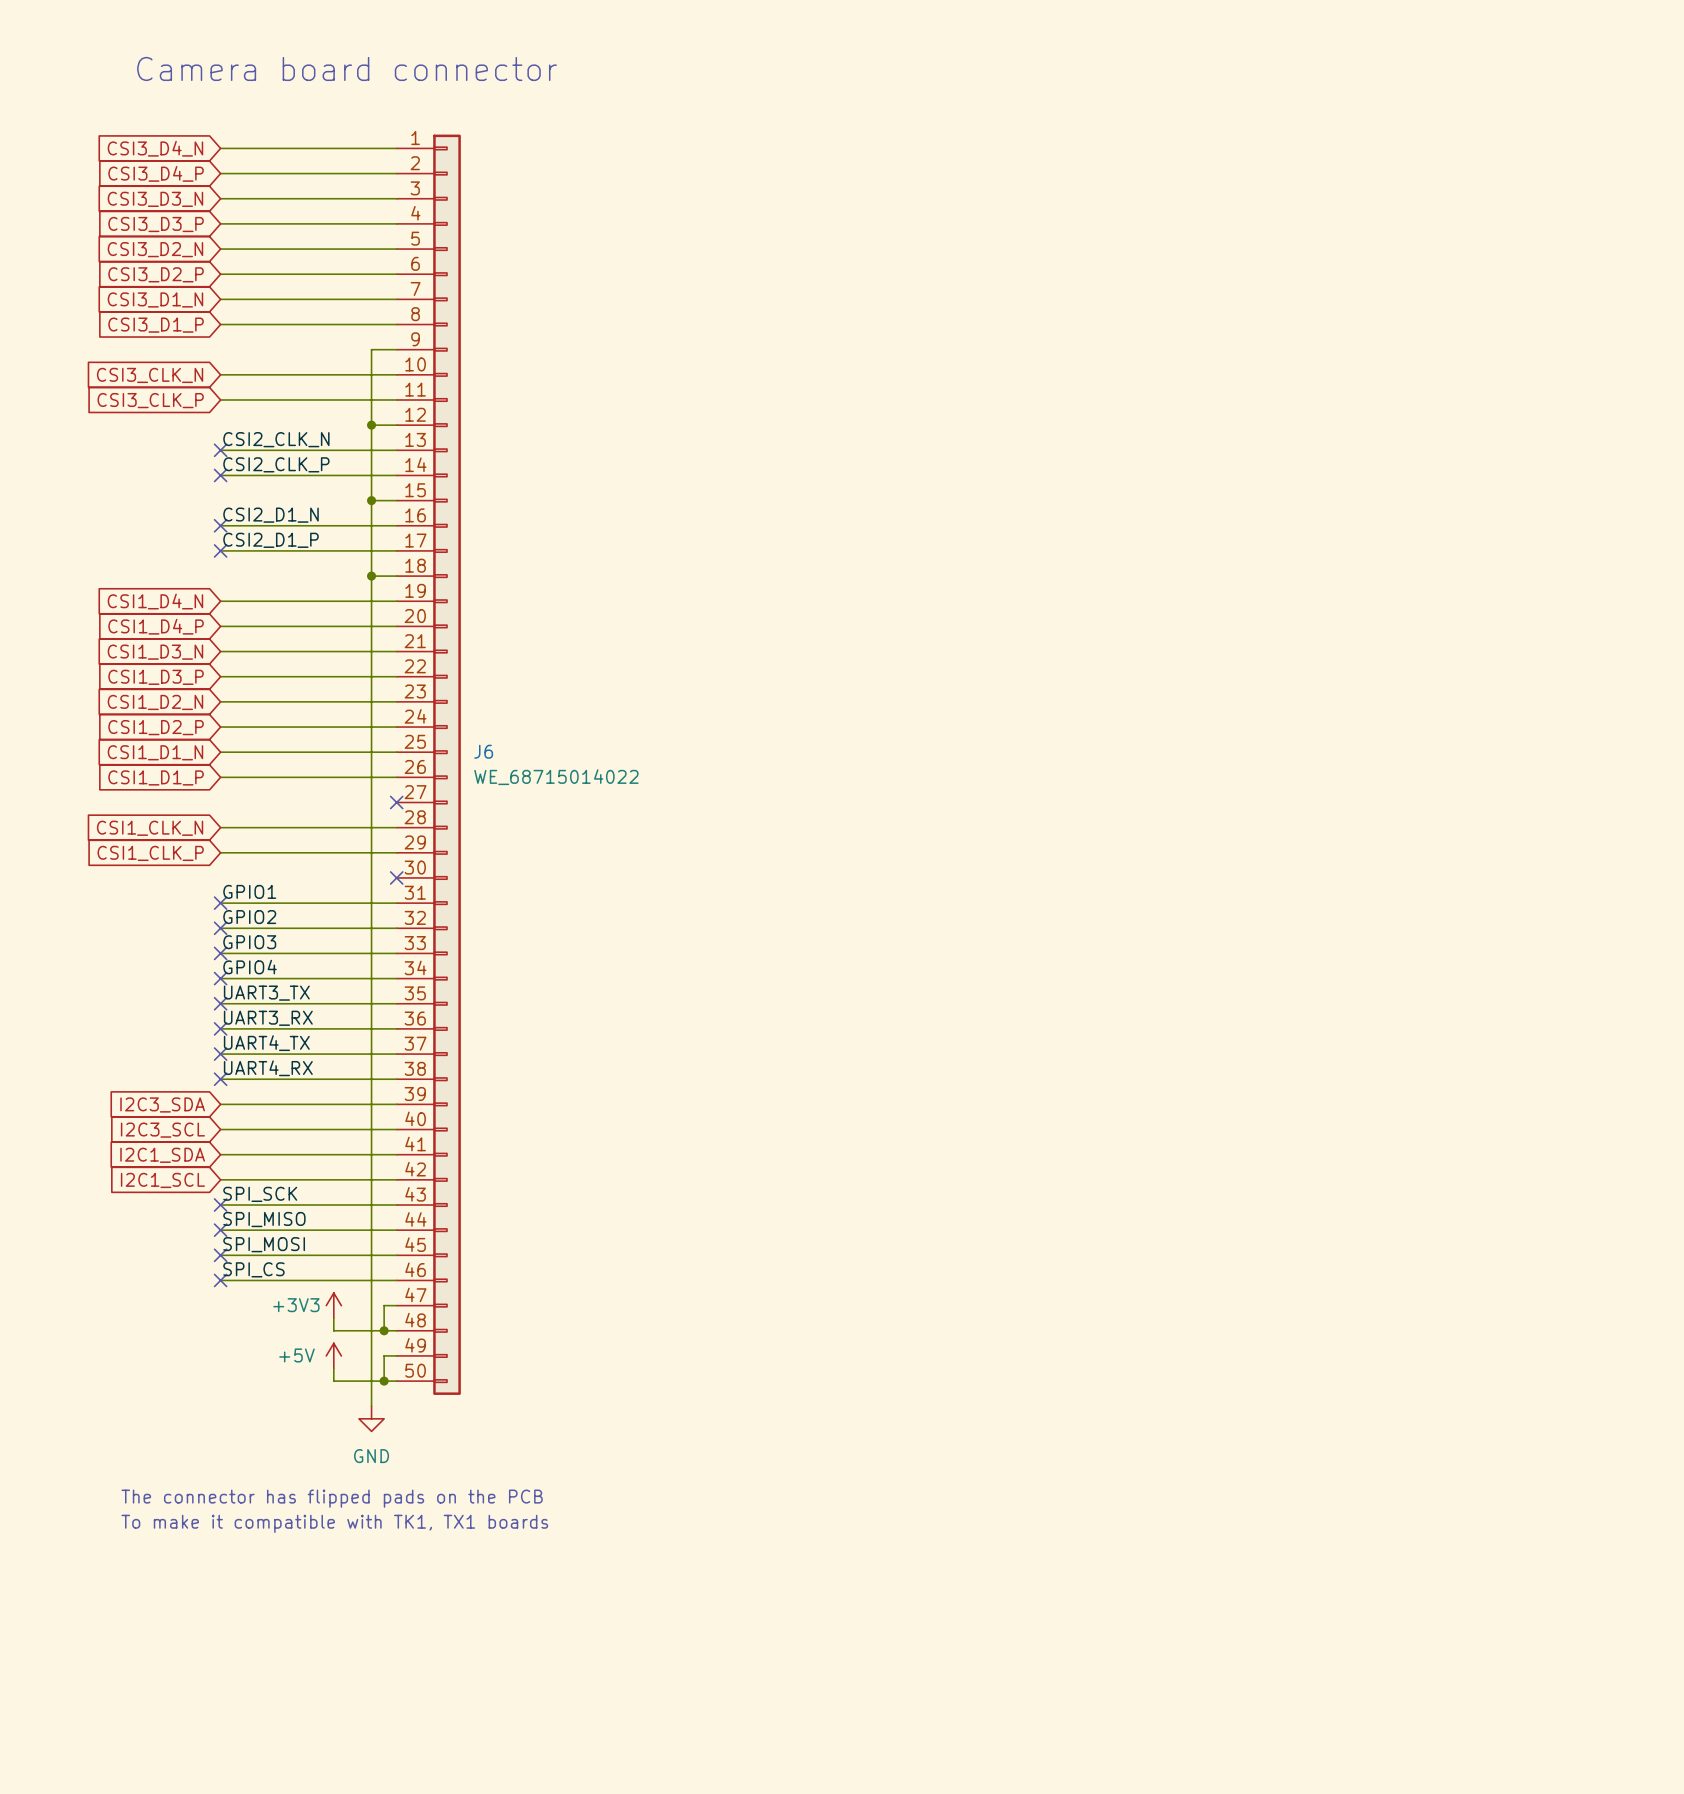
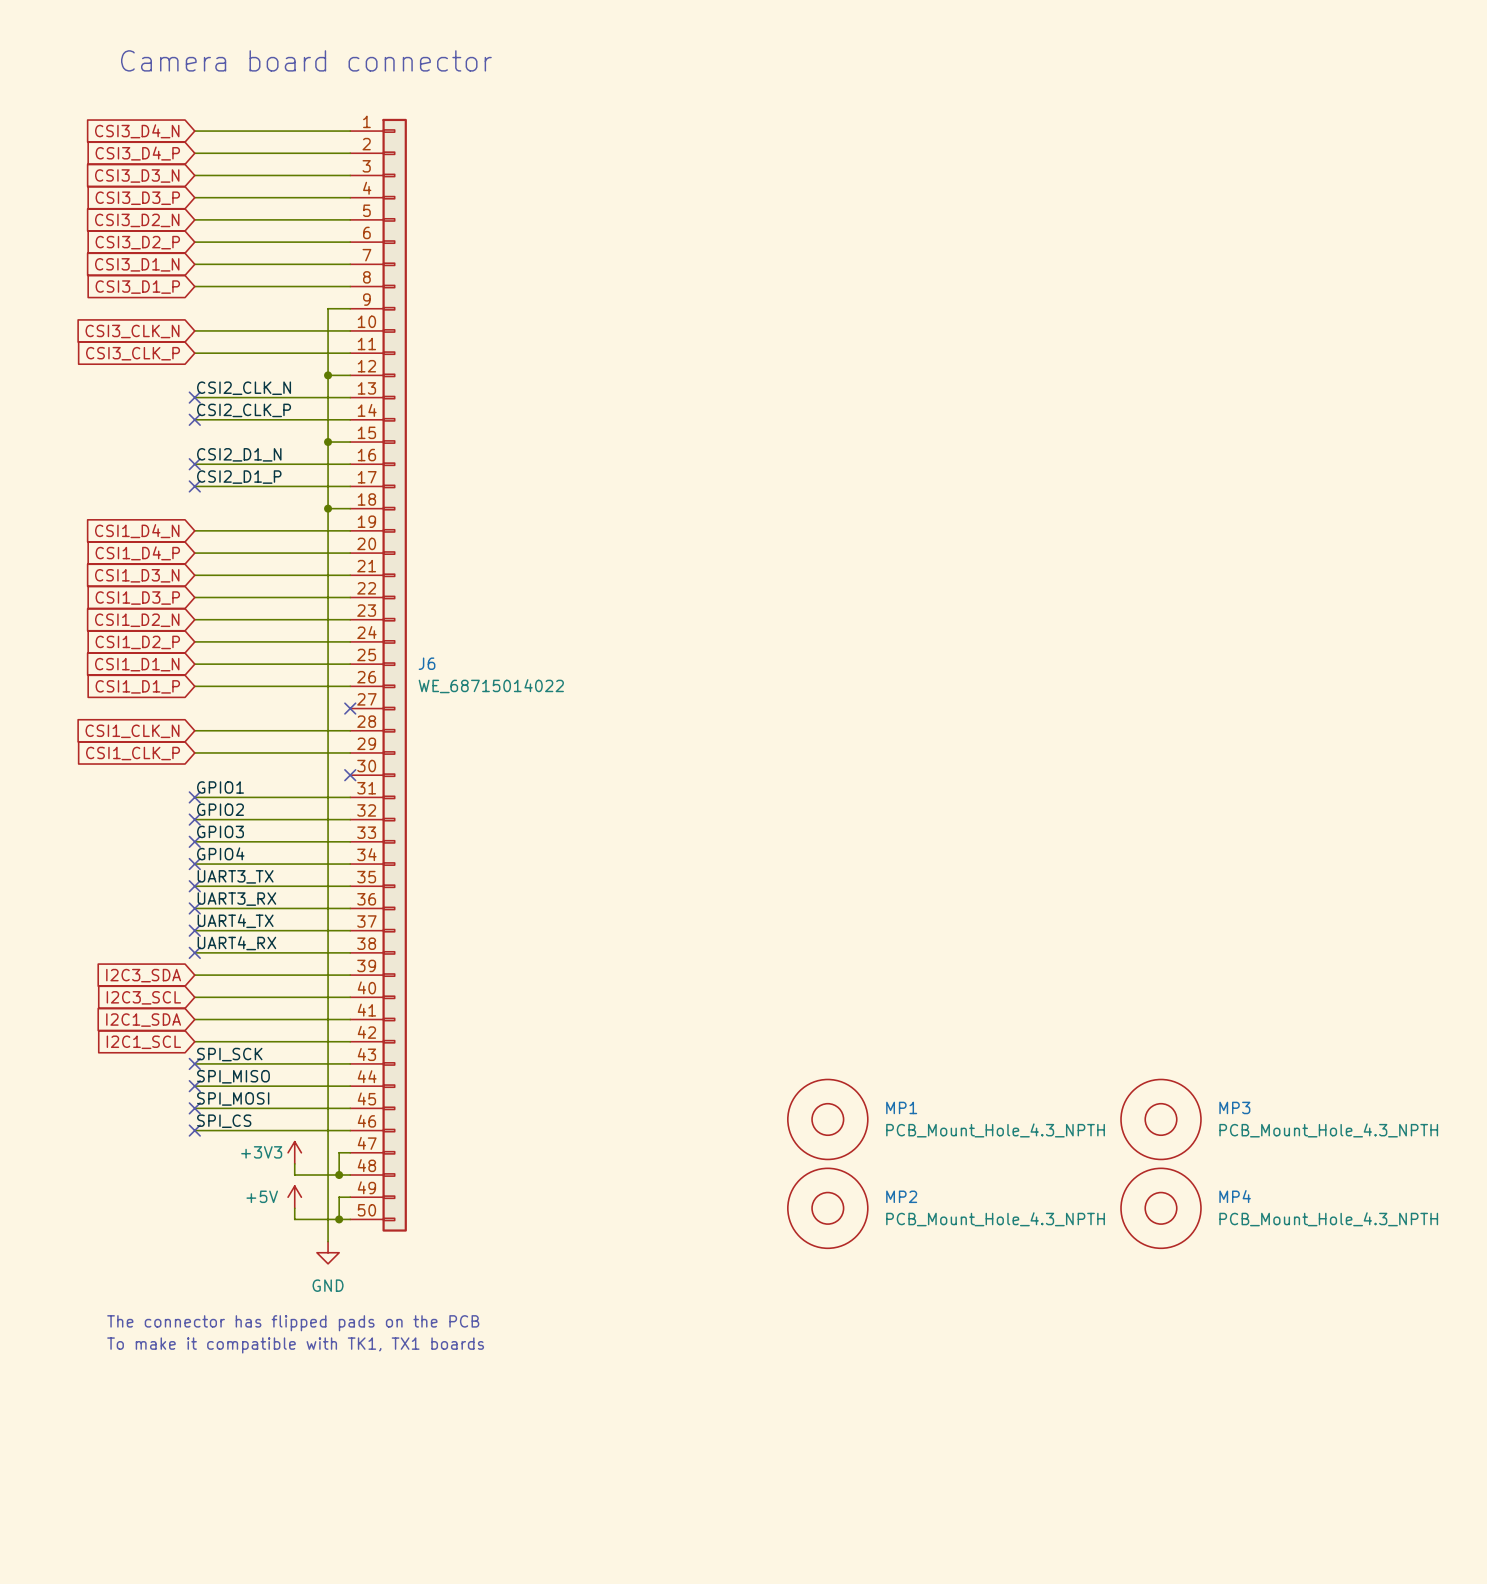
MP1: none -> PCB_Mount_Hole_4.3_NPTH (827, 1119)
MP3: none -> PCB_Mount_Hole_4.3_NPTH (1160, 1119)
MP2: none -> PCB_Mount_Hole_4.3_NPTH (827, 1208)
MP4: none -> PCB_Mount_Hole_4.3_NPTH (1160, 1208)

